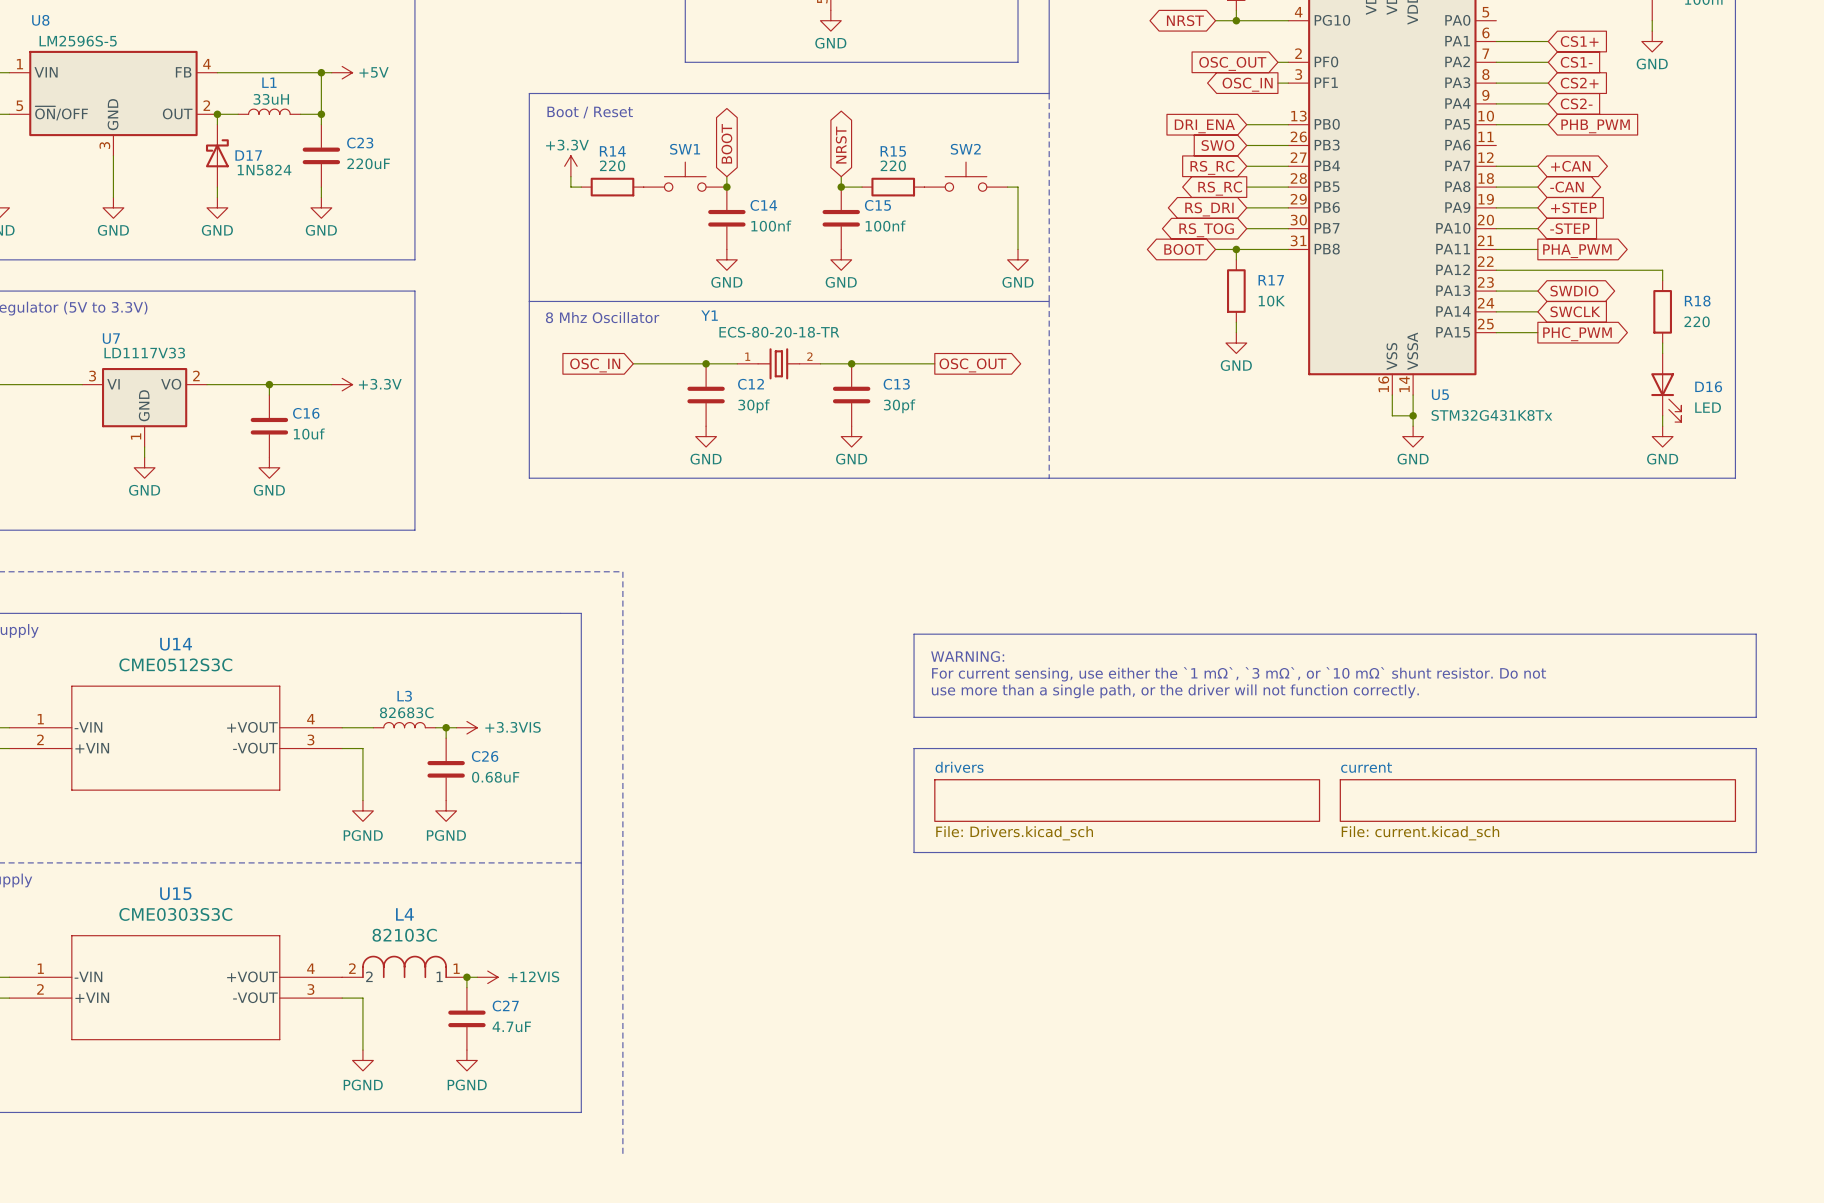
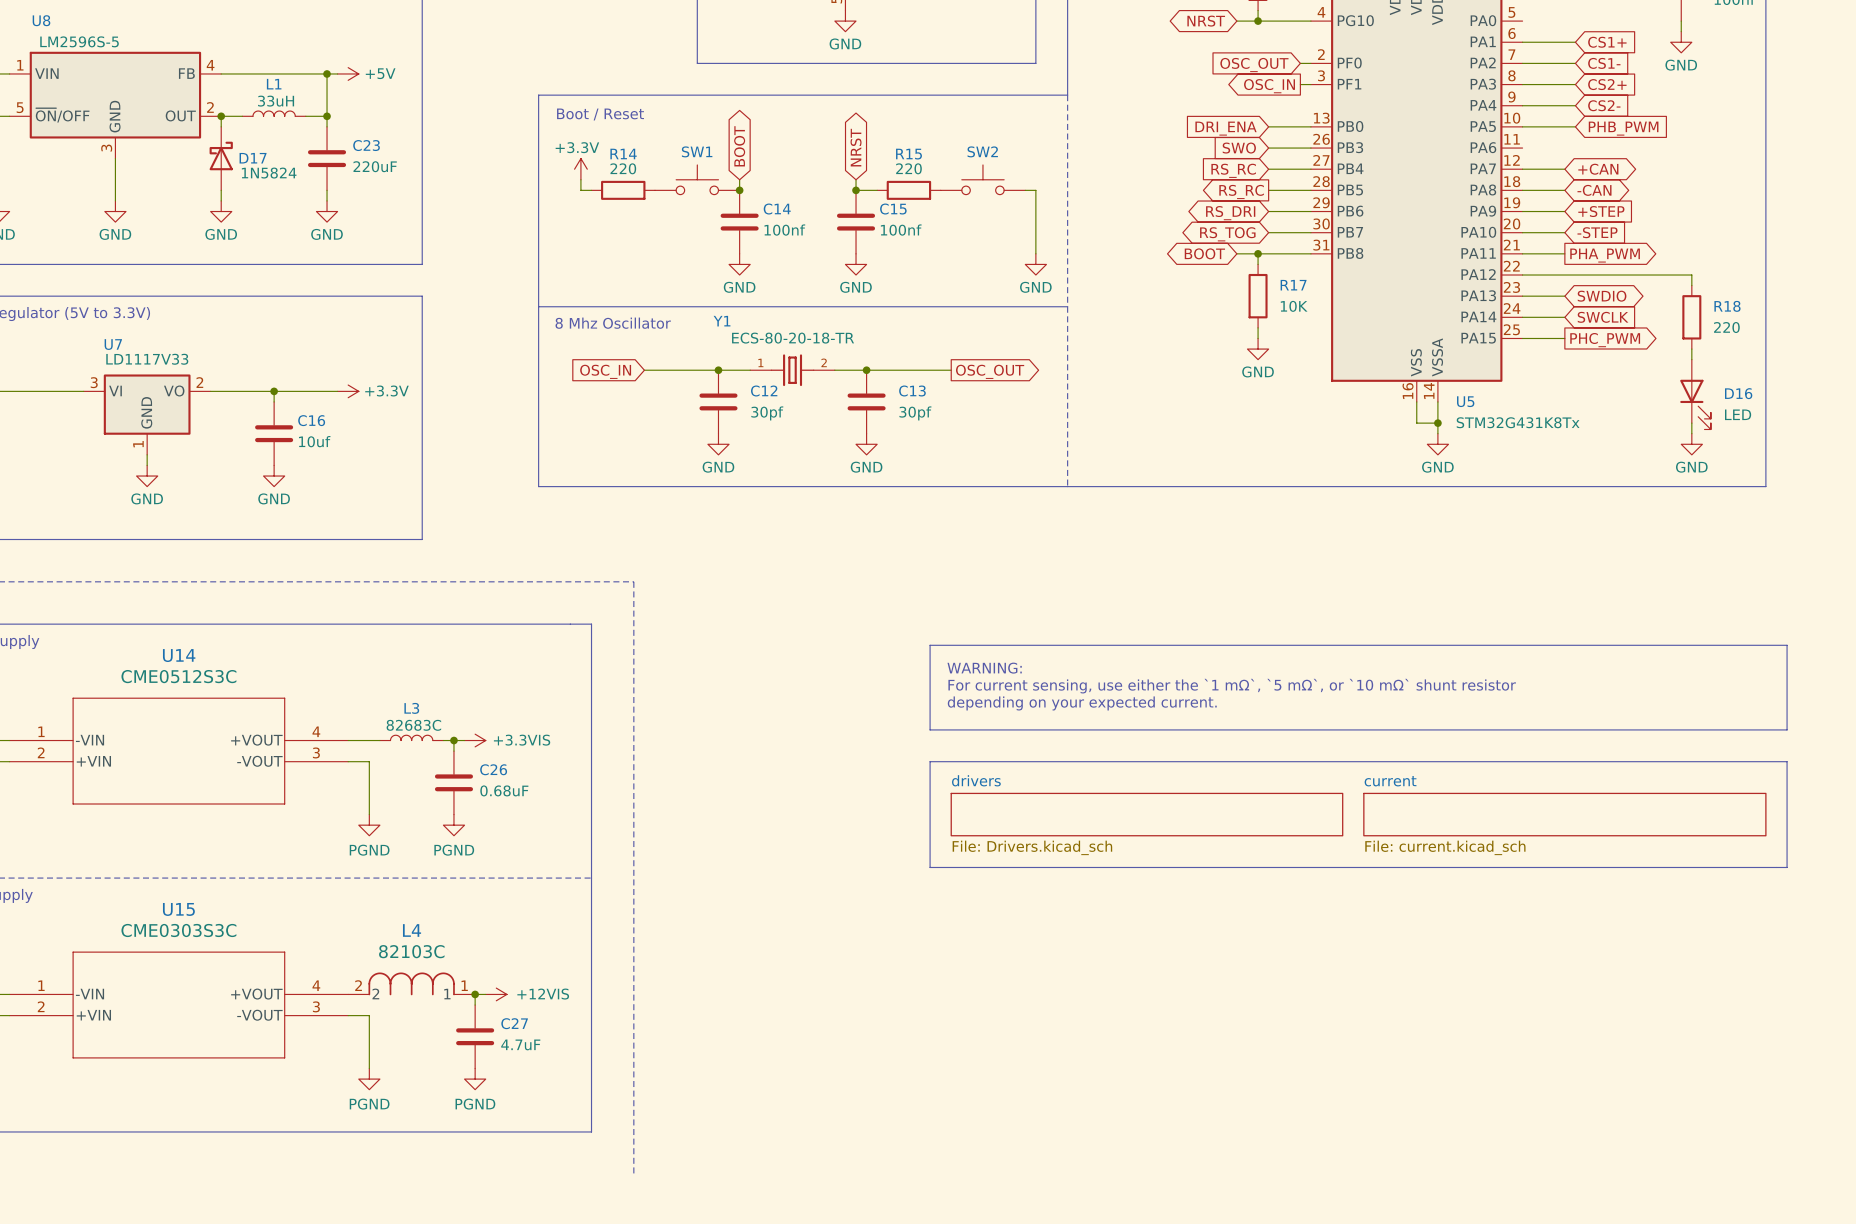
text: For current sensing, use either the `1 mΩ`, `3 mΩ`, or `10 mΩ` shunt resistor. Do not (1239, 674) -> For current sensing, use either the `1 mΩ`, `5 mΩ`, or `10 mΩ` shunt resistor (1232, 686)
text: use more than a single path, or the driver will not function correctly. (1175, 691) -> depending on your expected current. (1082, 703)

